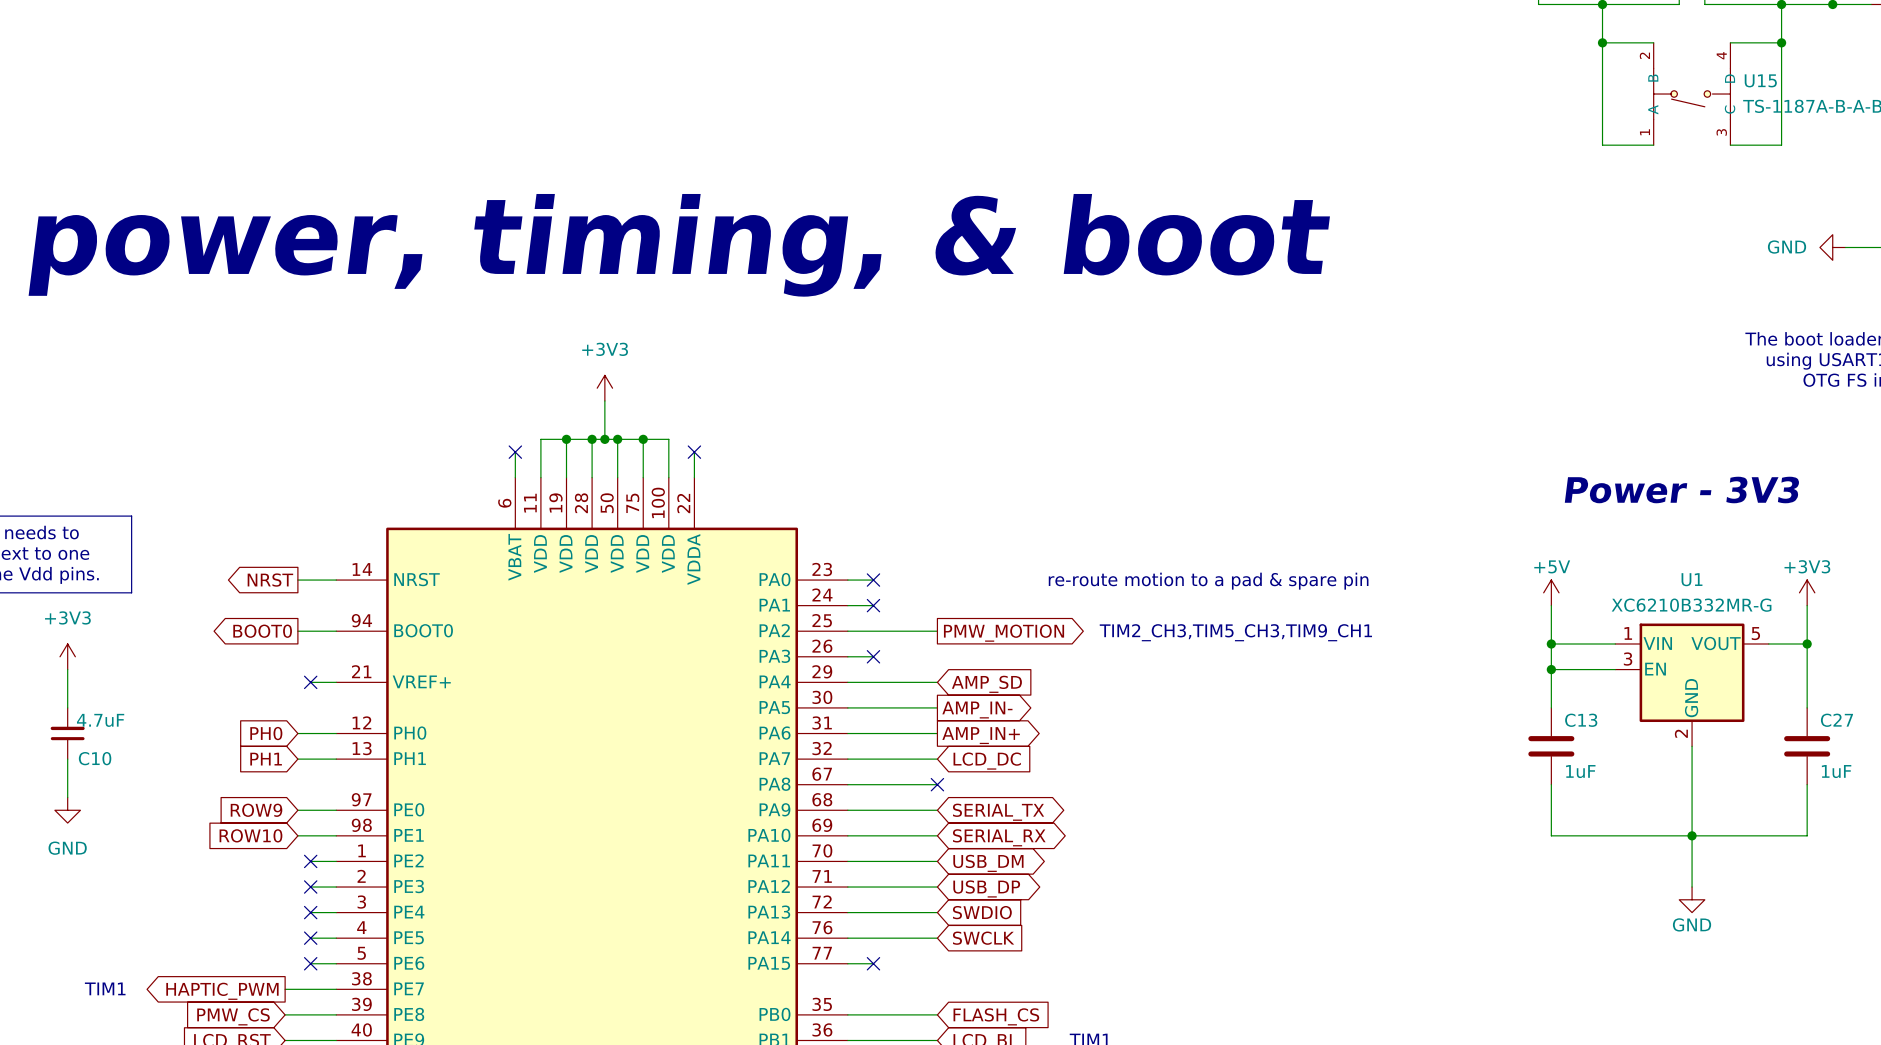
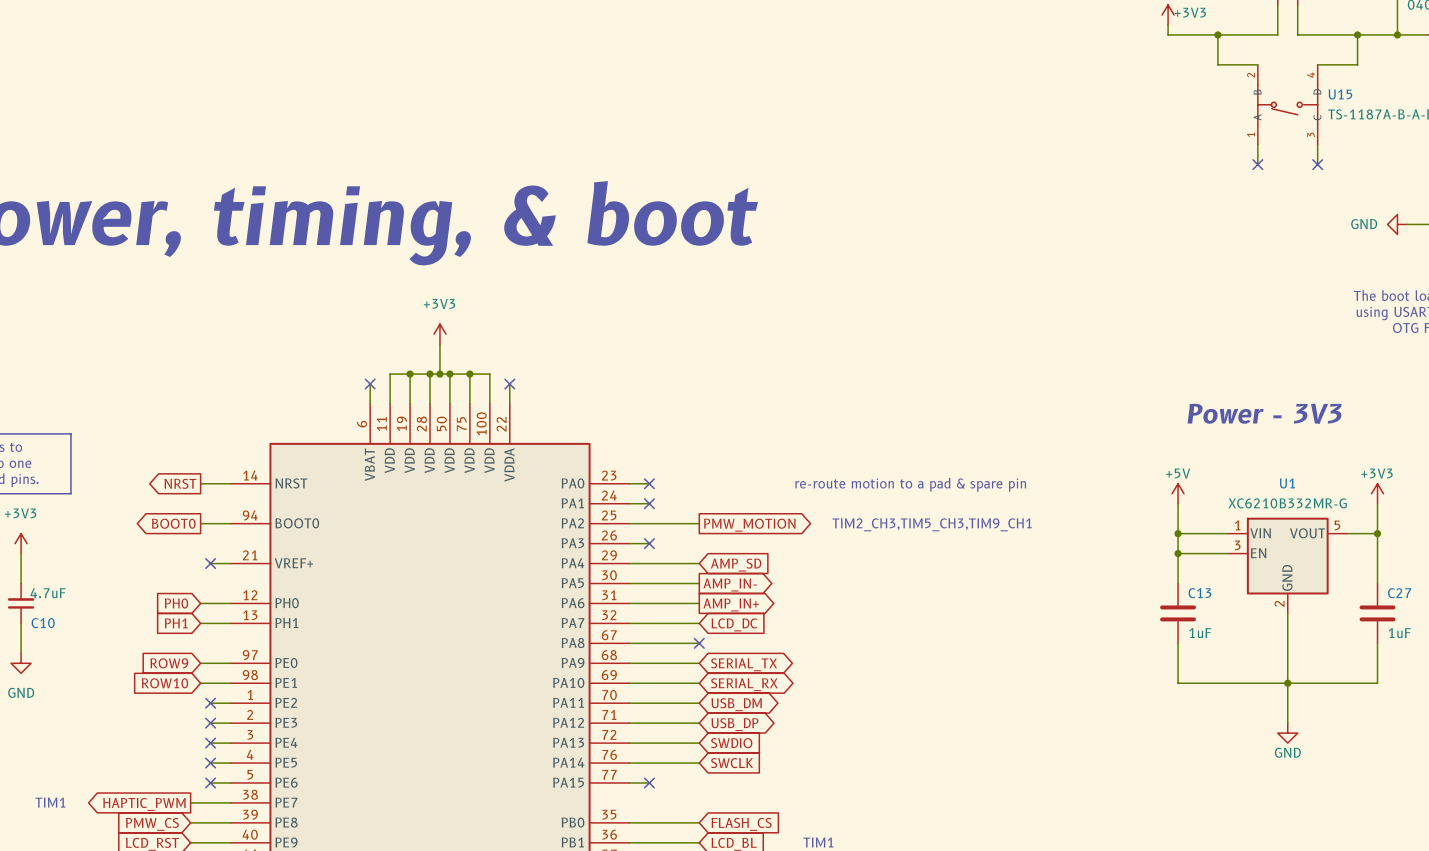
wire: (1602, 42) (1602, 145) (1653, 145) -> (1257, 164) (1257, 144)
junction: (1602, 42) -> none
wire: (1781, 42) (1781, 145) (1730, 145) -> (1317, 164) (1317, 144)
junction: (1781, 42) -> none
no-connect mark: none -> (1257, 164)
no-connect mark: none -> (1317, 164)

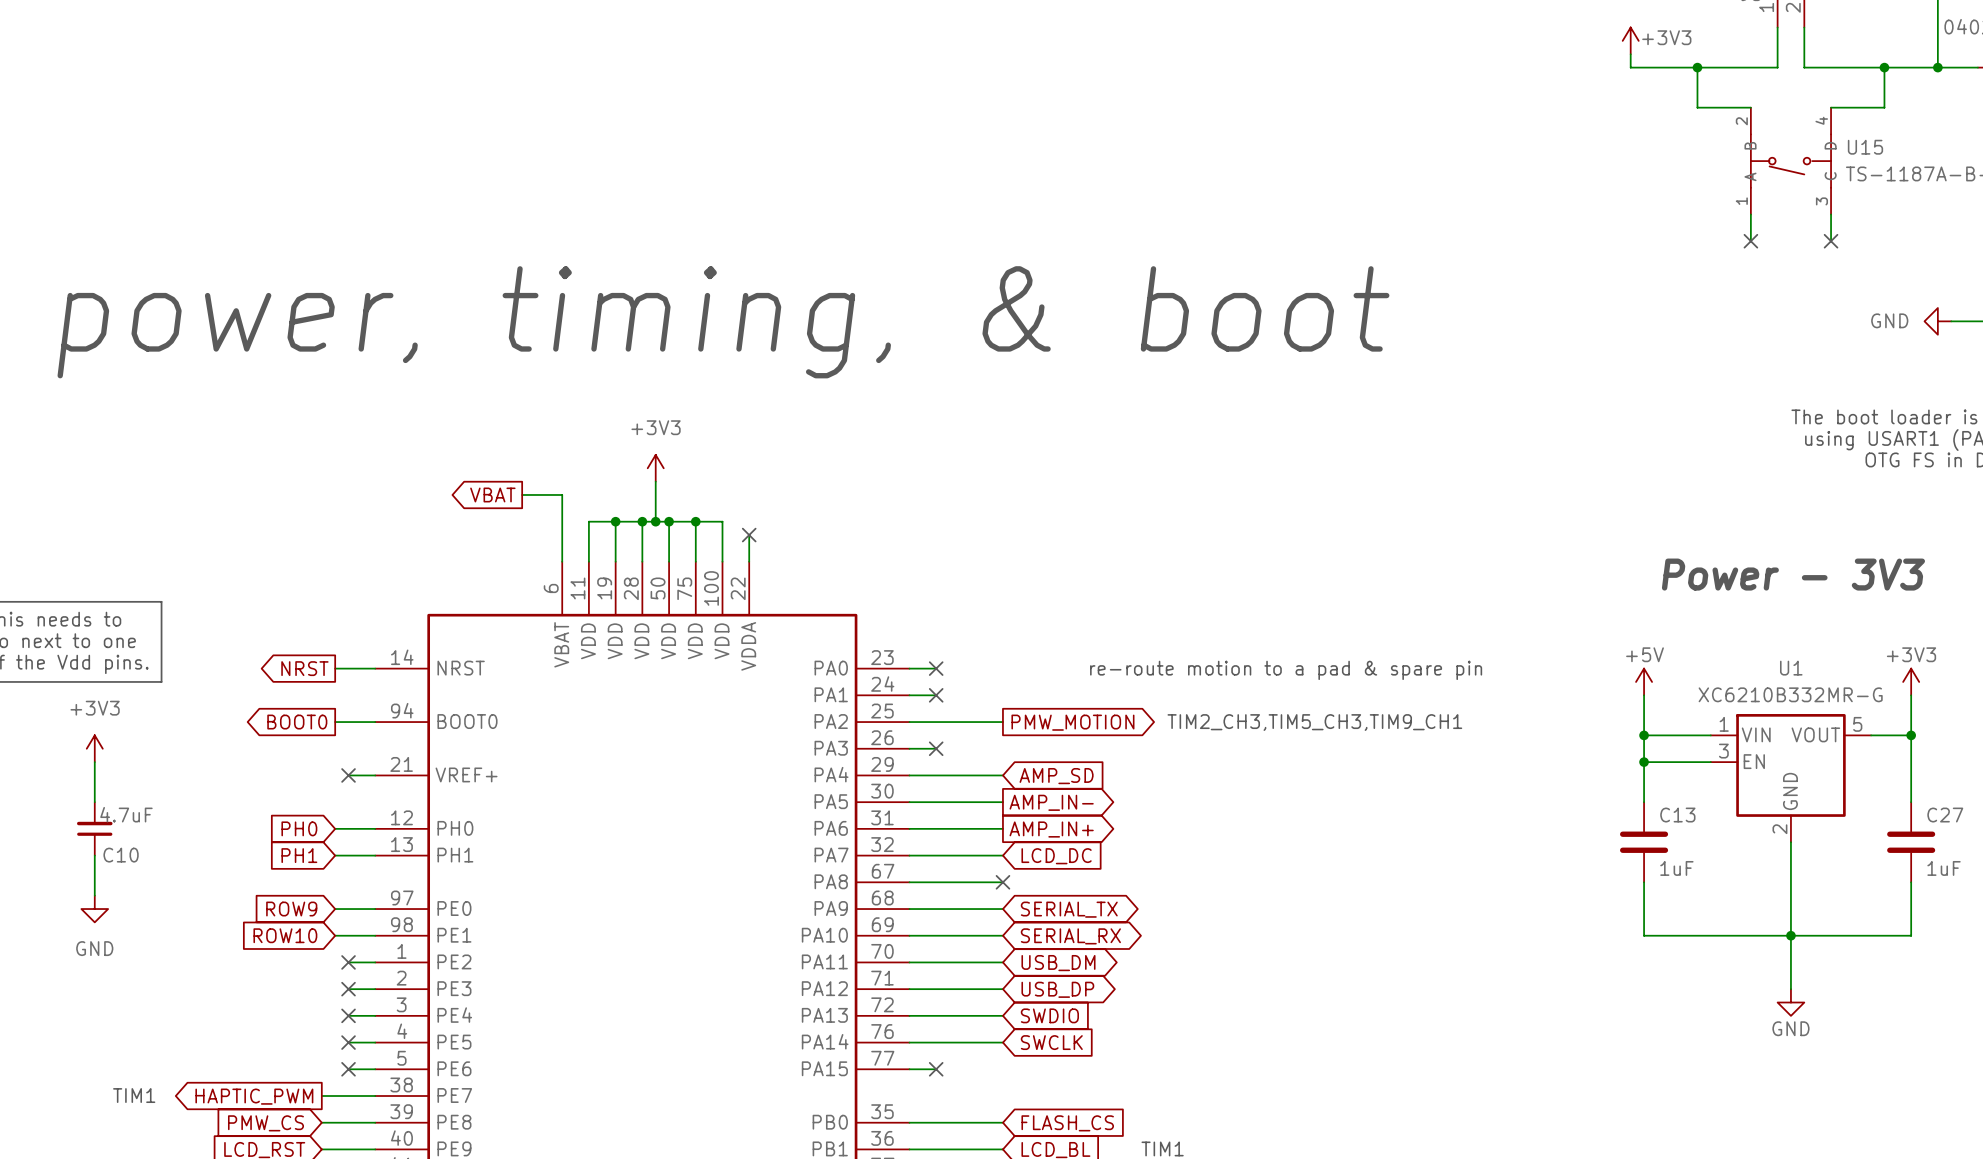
global label: none -> VBAT (492, 494)
wire: none -> (522, 494) (562, 494) (562, 535)
no-connect mark: (370, 384) -> none

